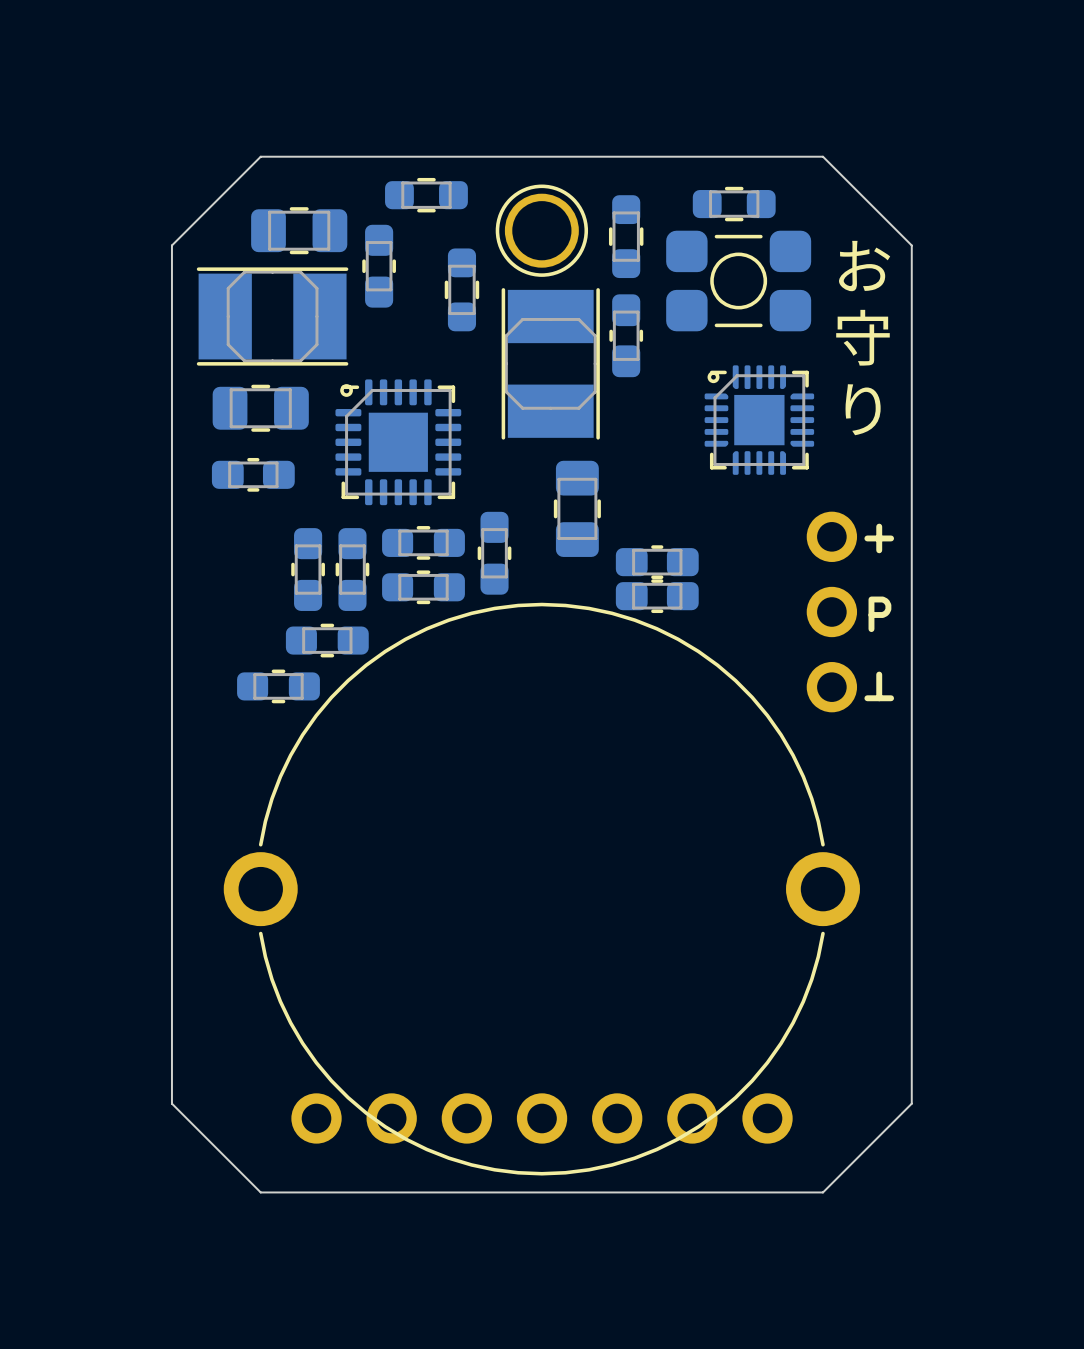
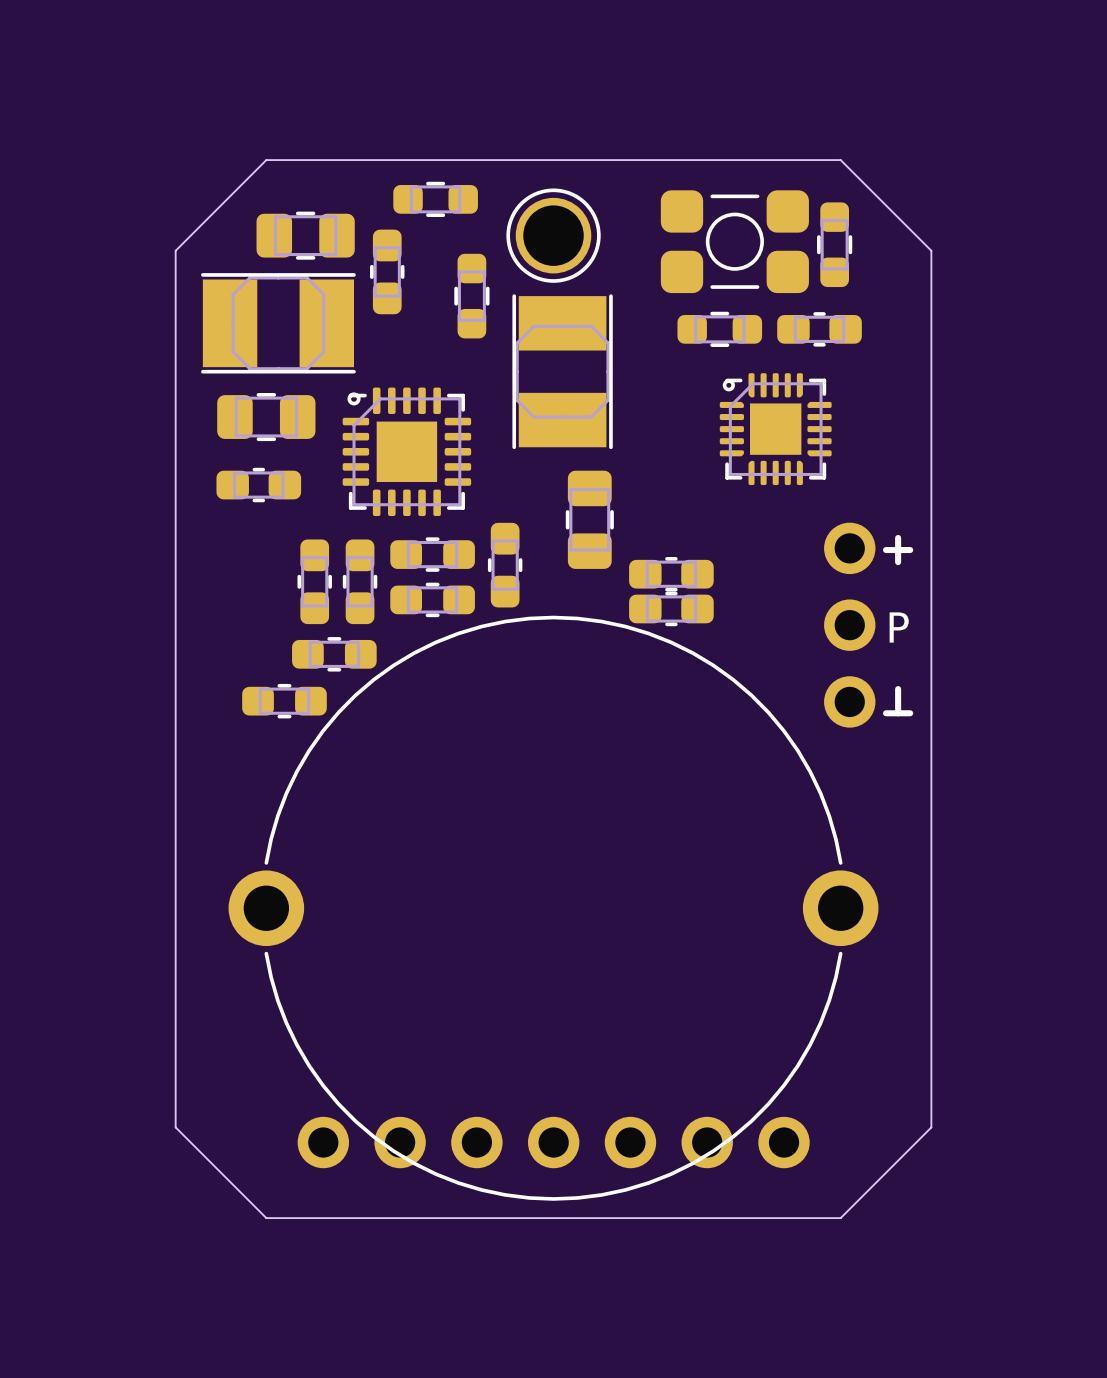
part: (734, 204) -> none
part: (626, 236) -> none
part: none -> (834, 244)
text: お (864, 266) -> none
part position: (738, 281) -> (734, 241)
part: none -> (719, 329)
part rotation: 0° (626, 335) -> 90° clockwise (819, 329)
part position: (626, 335) -> (819, 329)
text: 守 (862, 337) -> none
text: り (863, 409) -> none

